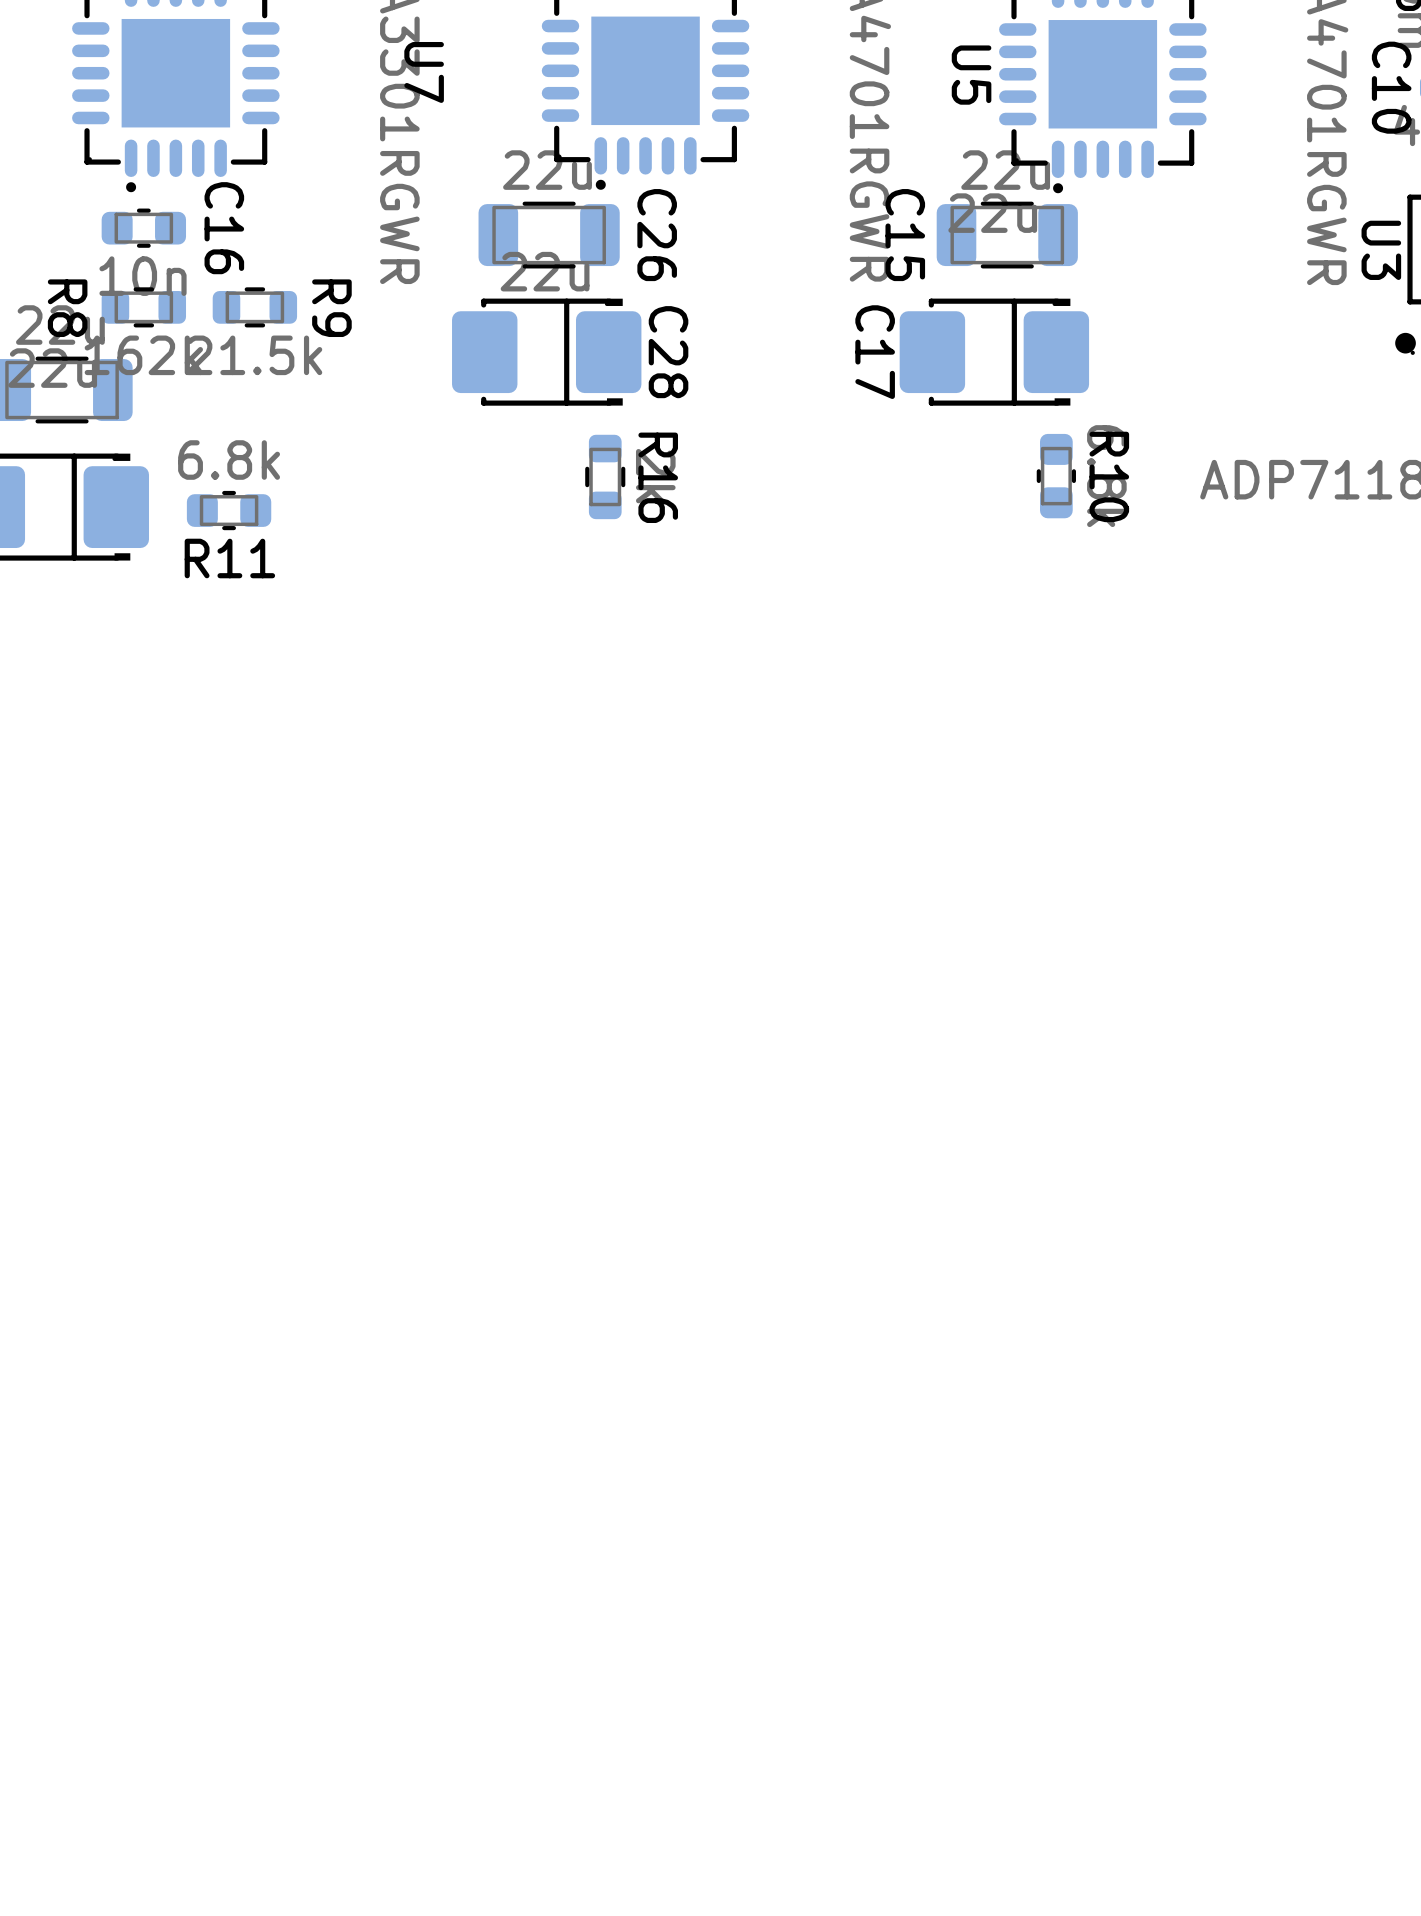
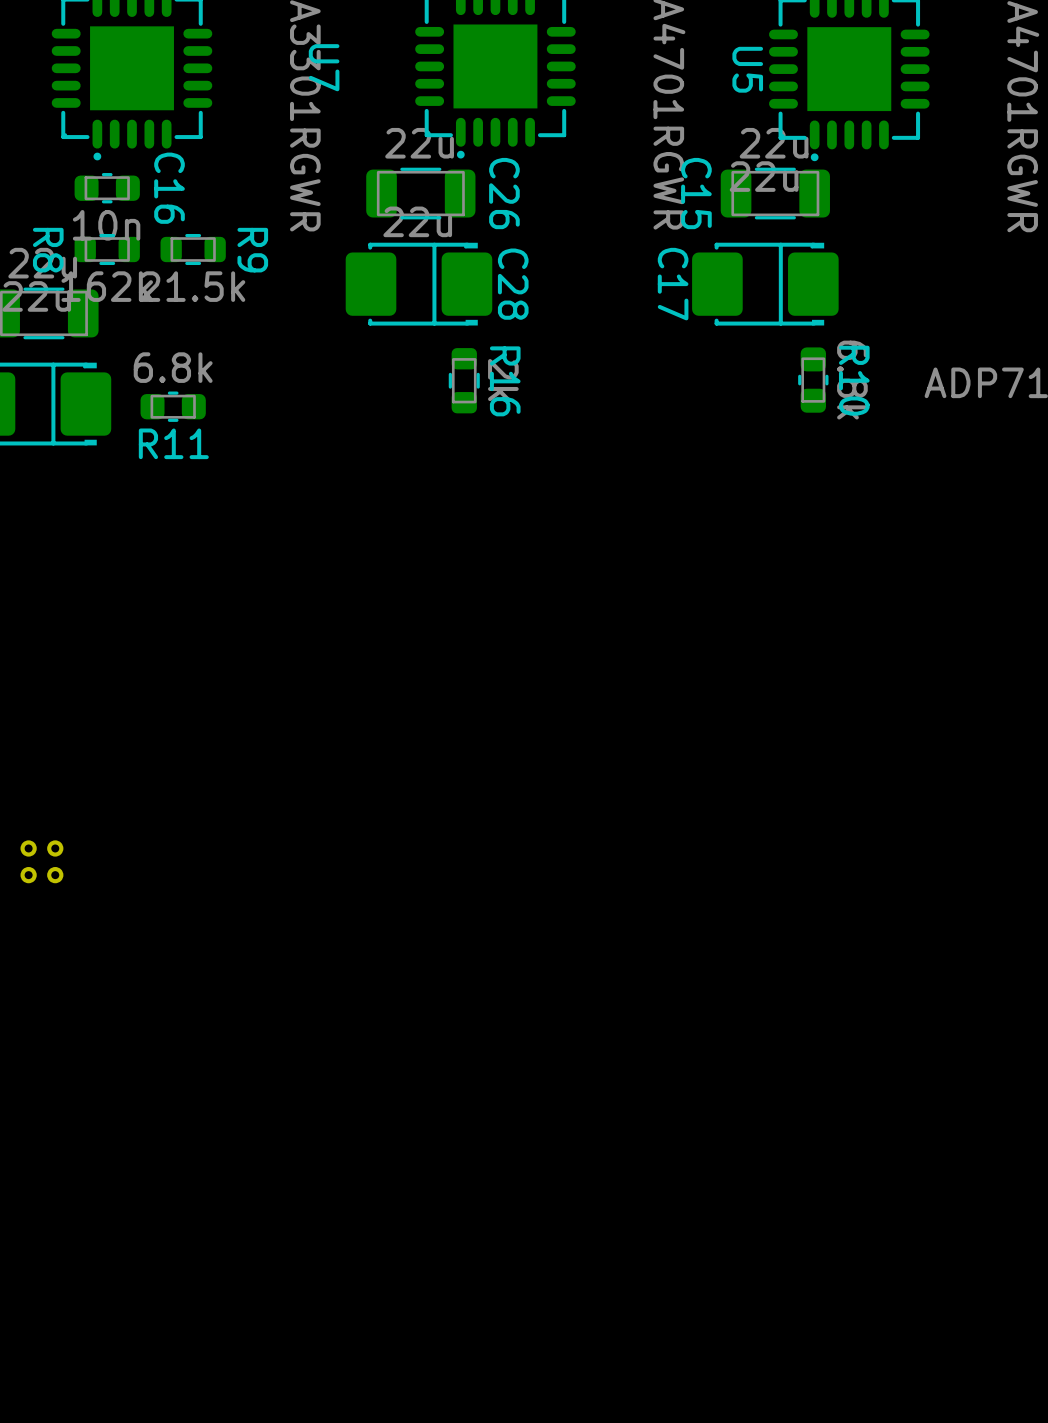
part: none -> (41, 861)

